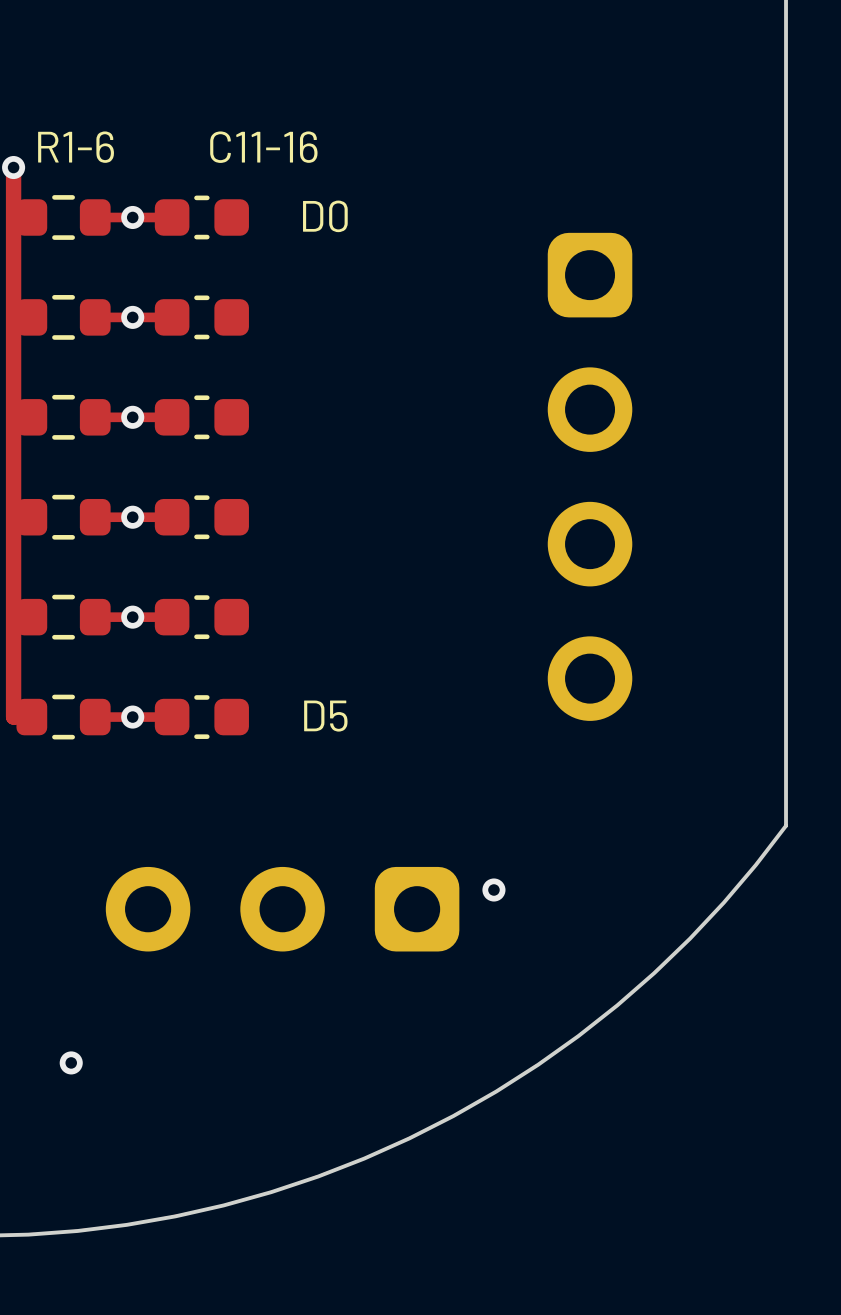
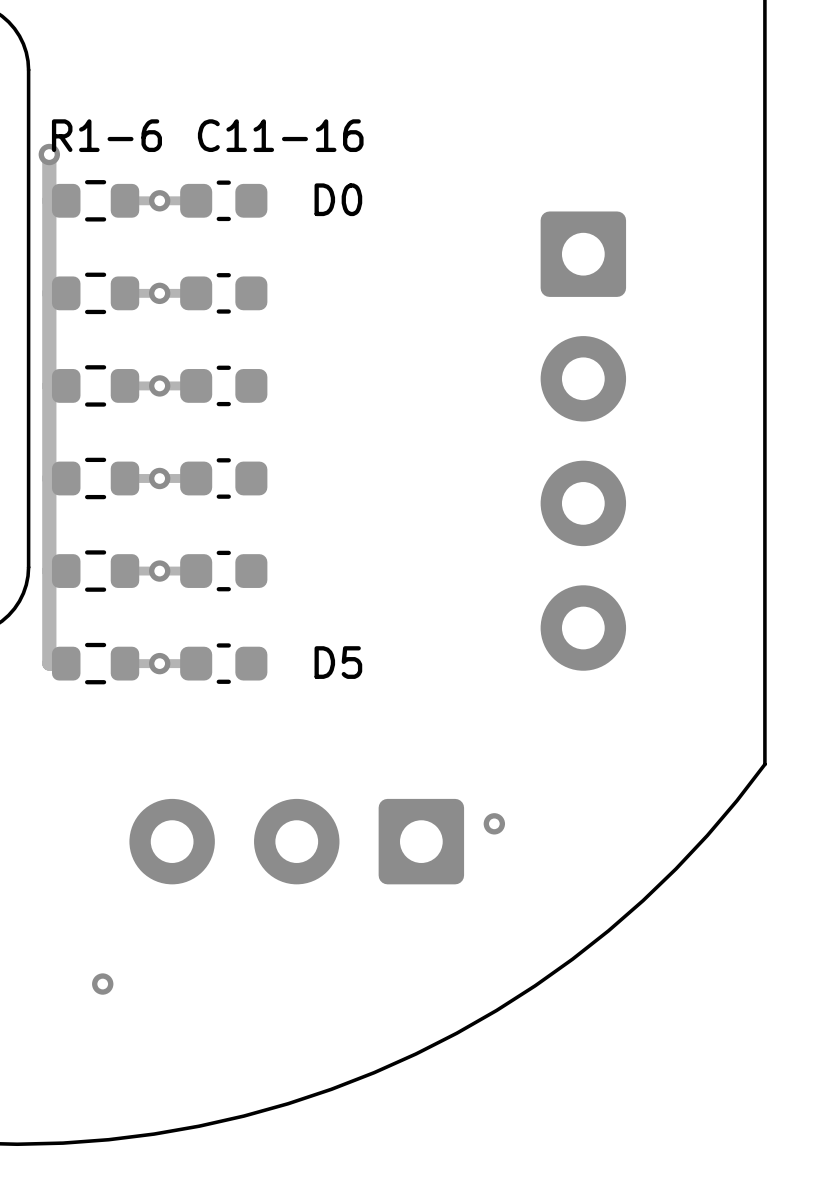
part footprint: [547, 232, 633, 721] -> [540, 211, 627, 671]
part footprint: [105, 866, 460, 952] -> [129, 798, 465, 885]

